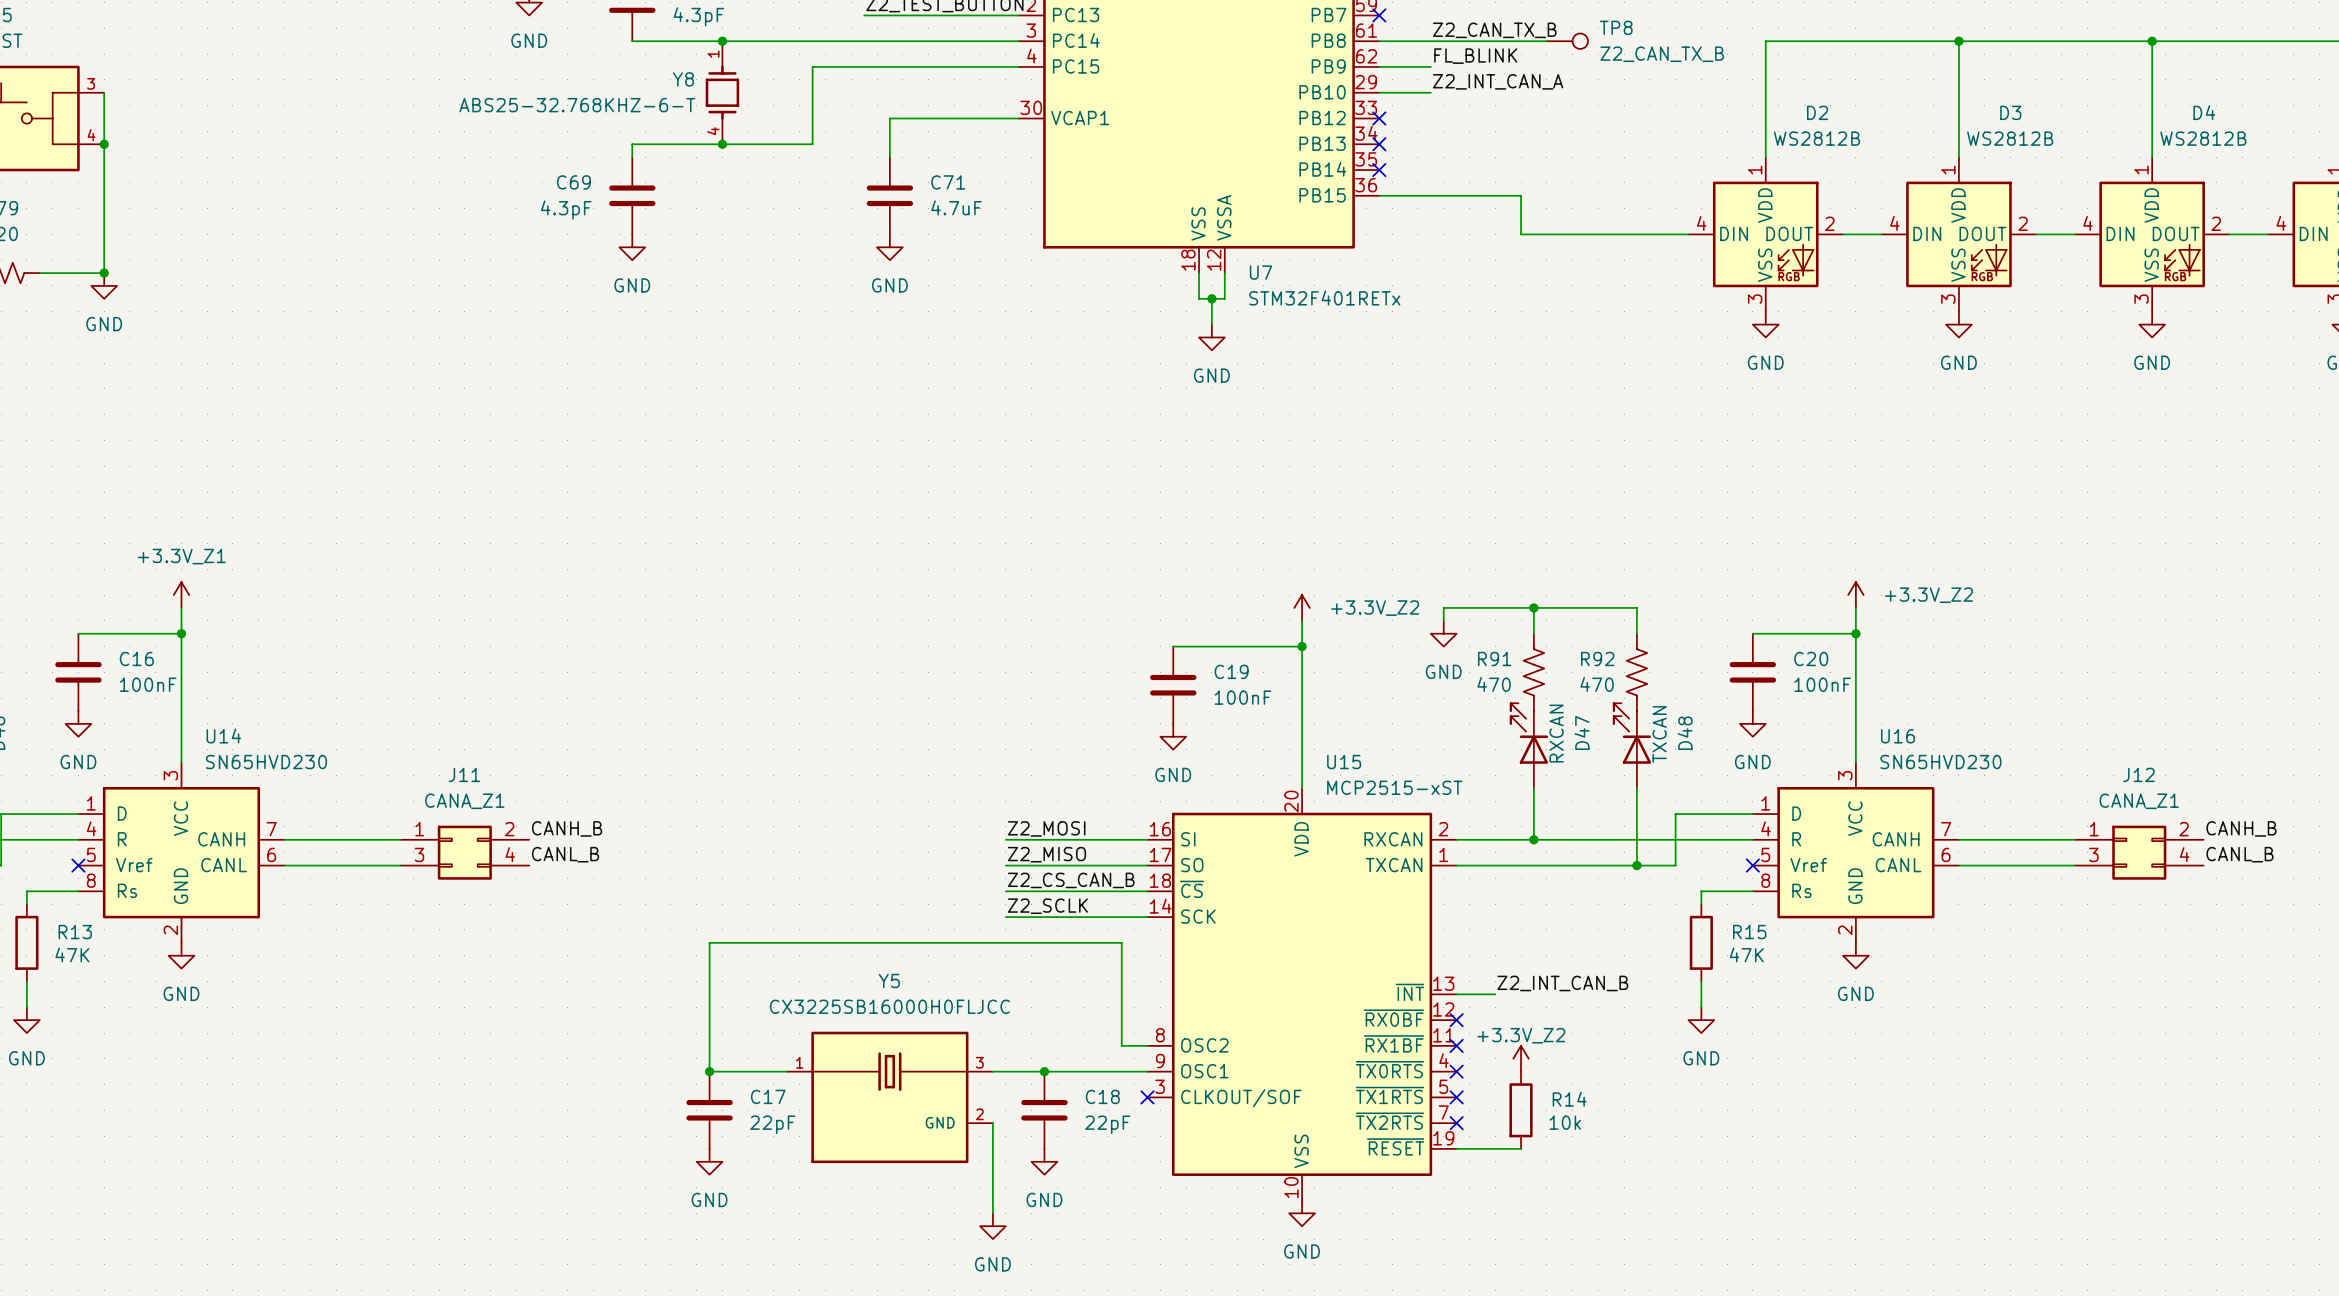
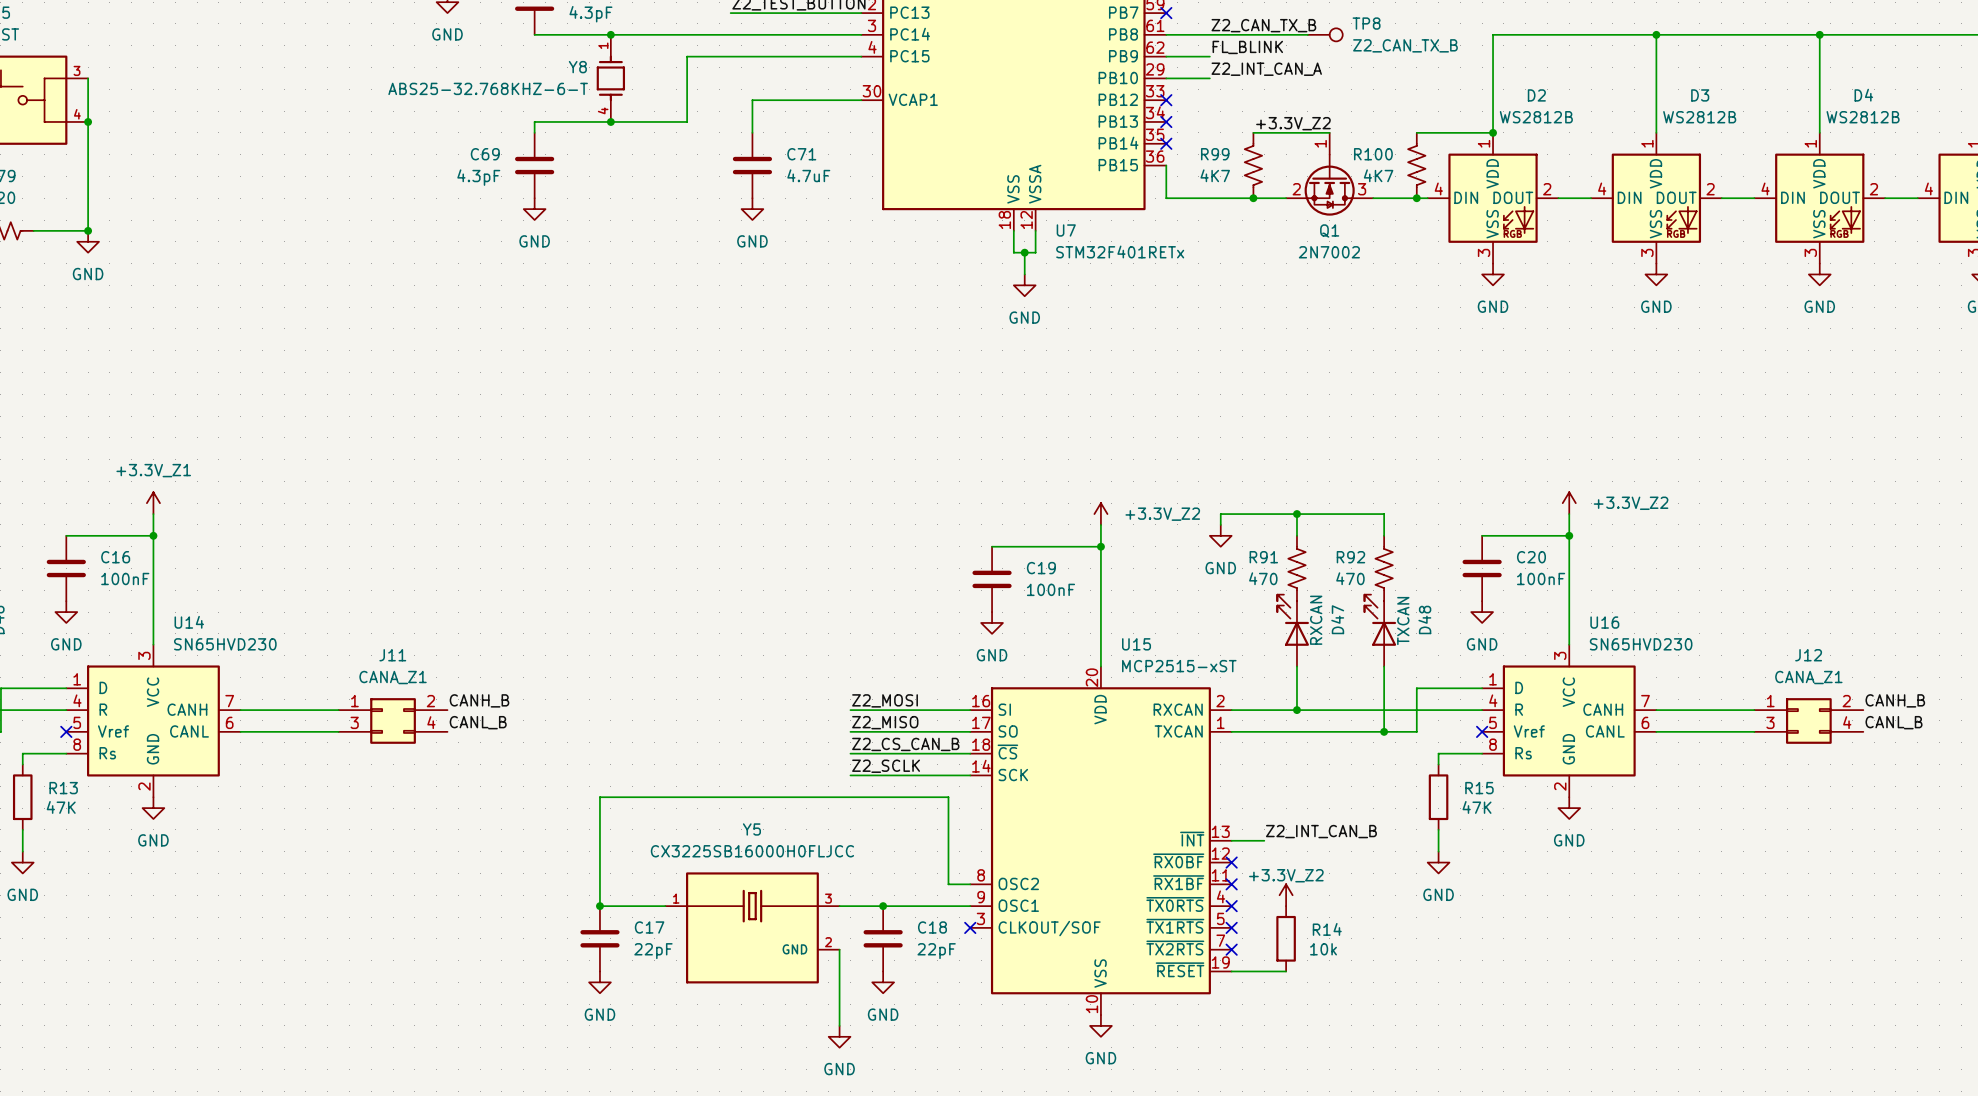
label: none -> +3.3V_Z2 (1293, 123)
wire: none -> (1253, 132) (1329, 132)
wire: none -> (1416, 132) (1493, 132)
junction: none -> (1493, 132)
wire: (1379, 195) (1521, 195) (1521, 234) (1624, 234) -> (1166, 165) (1166, 198) (1286, 198)
R99: none -> 4K7 (1253, 165)
R100: none -> 4K7 (1416, 165)
Q1: none -> 2N7002 (1329, 174)
junction: none -> (1253, 198)
junction: none -> (1416, 198)

